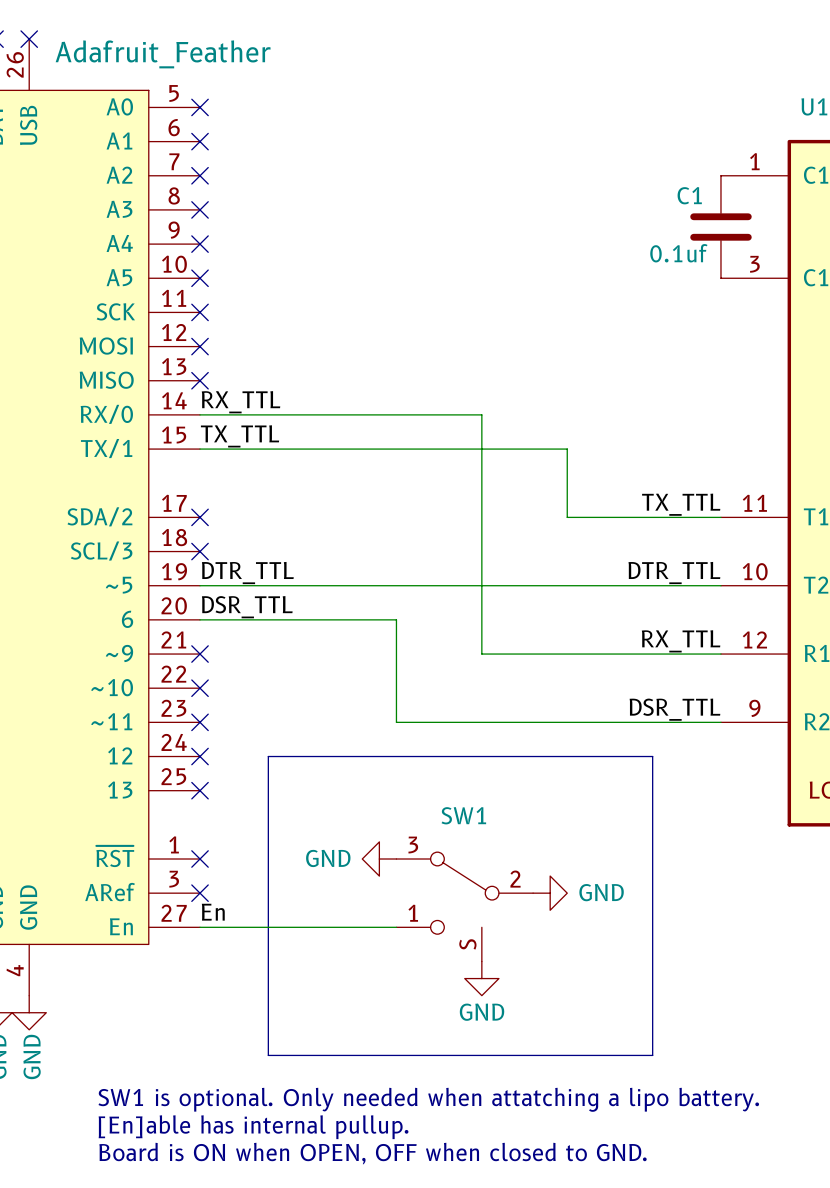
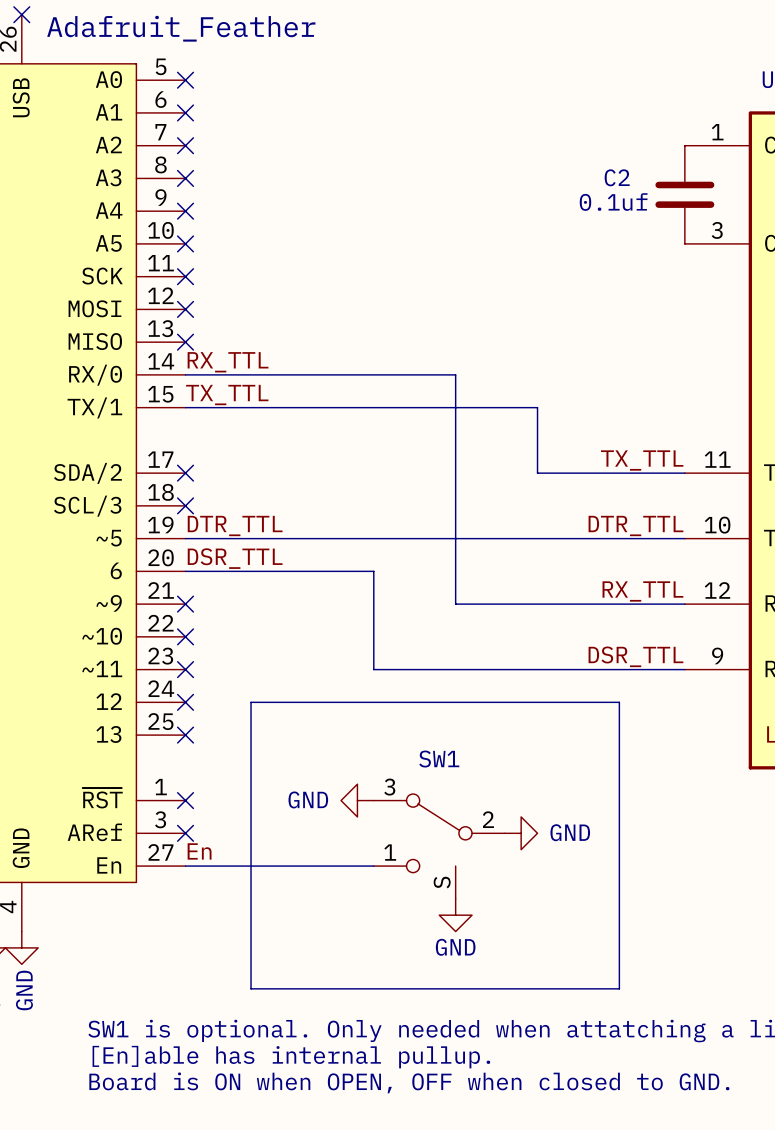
C1 name: C1 (689, 195) -> C2 (617, 177)
C1 value position: 0.1uf (678, 253) -> 0.1uf (613, 202)

